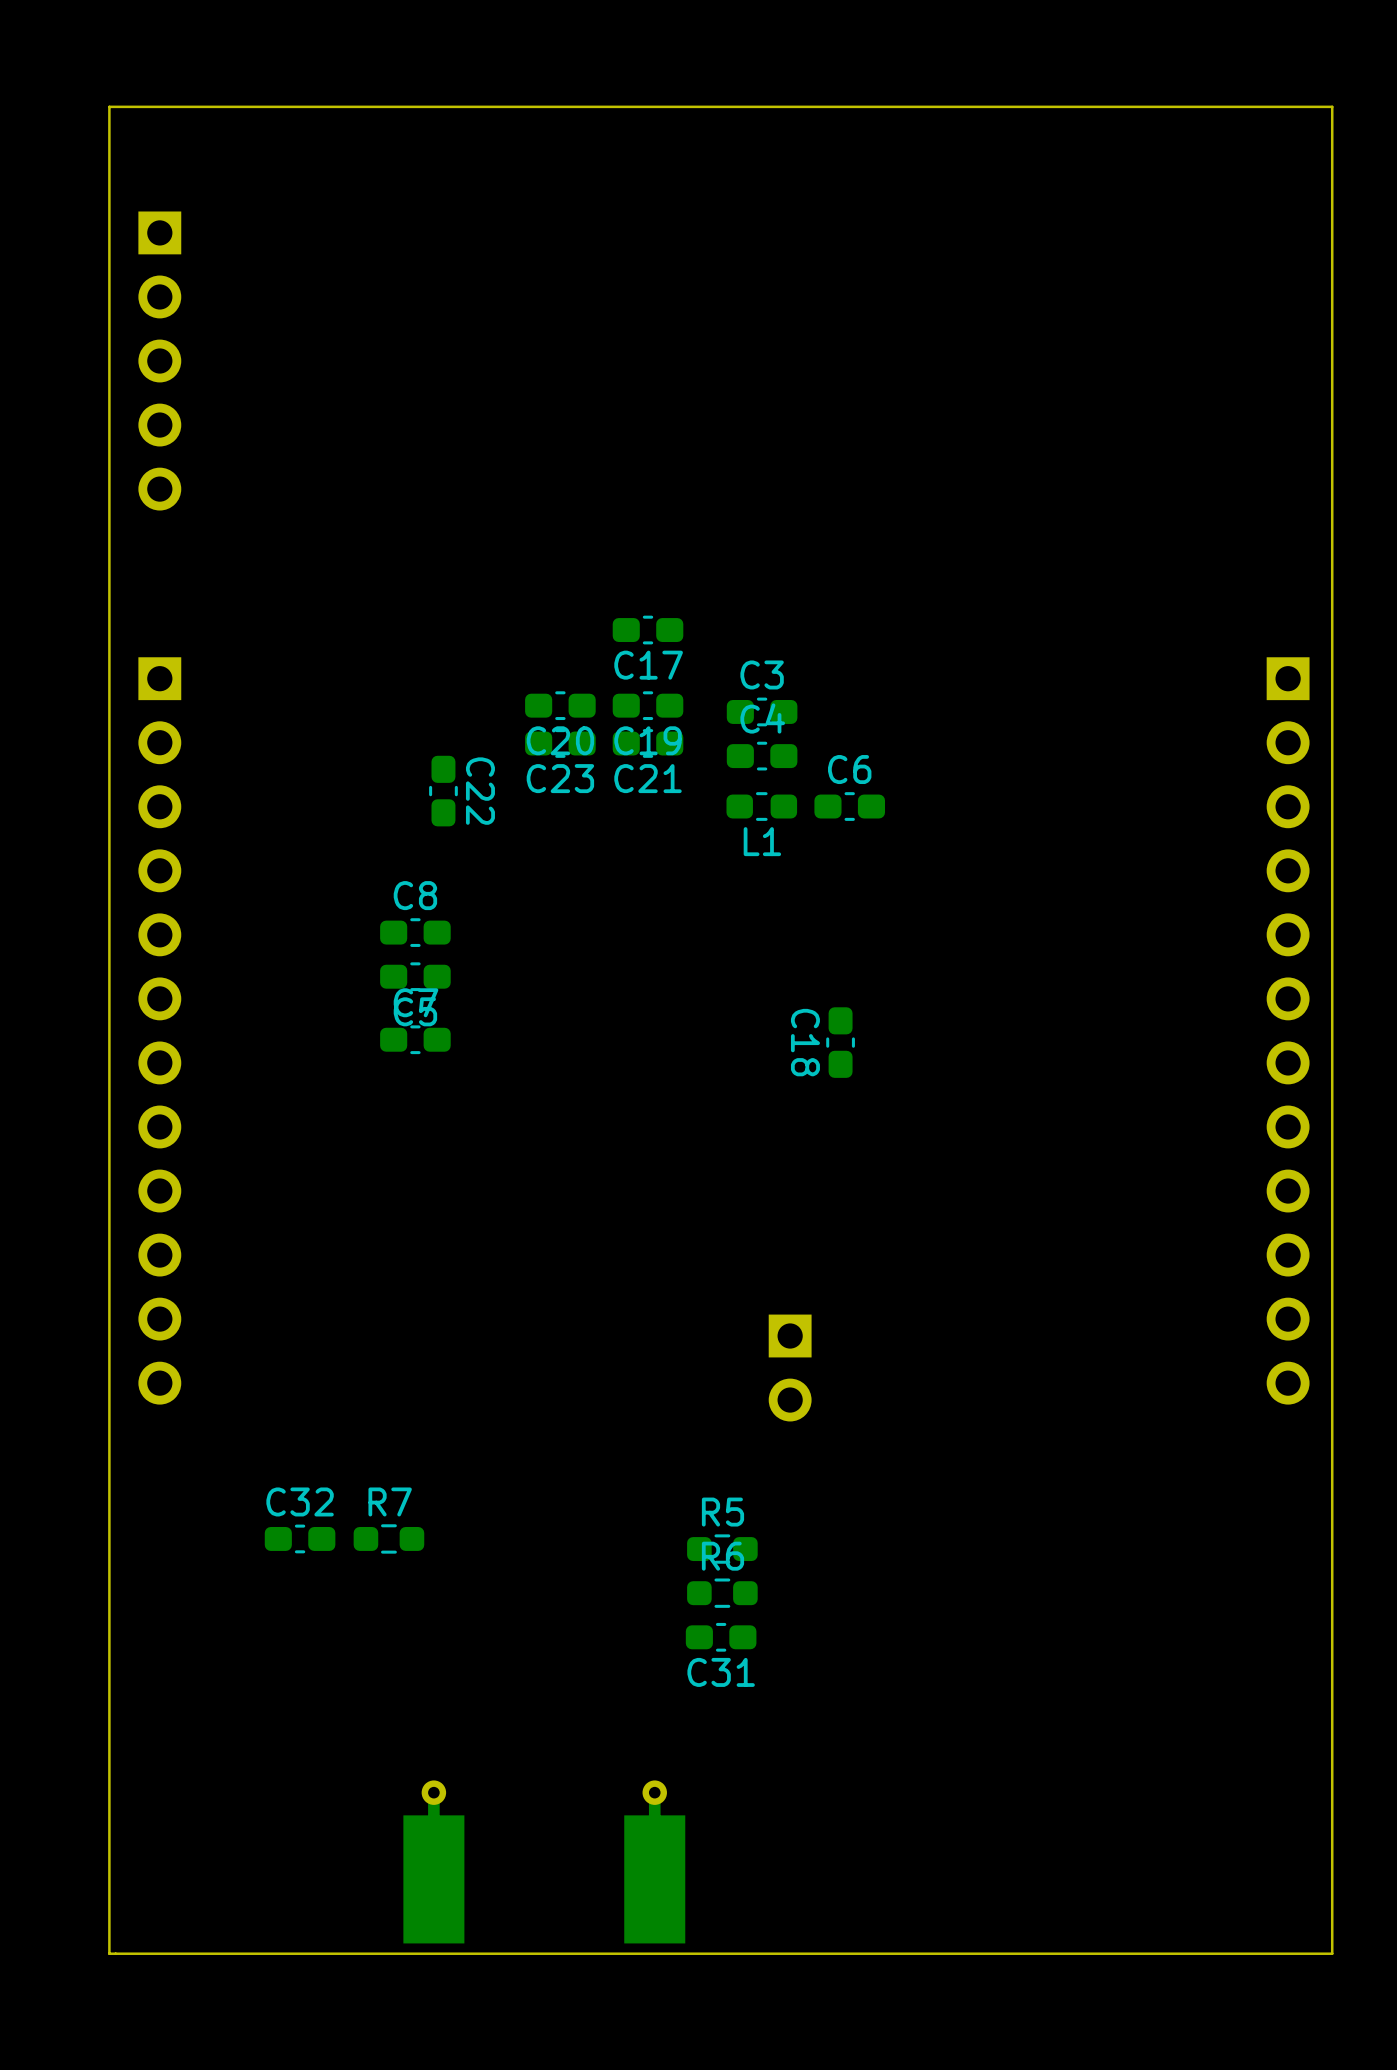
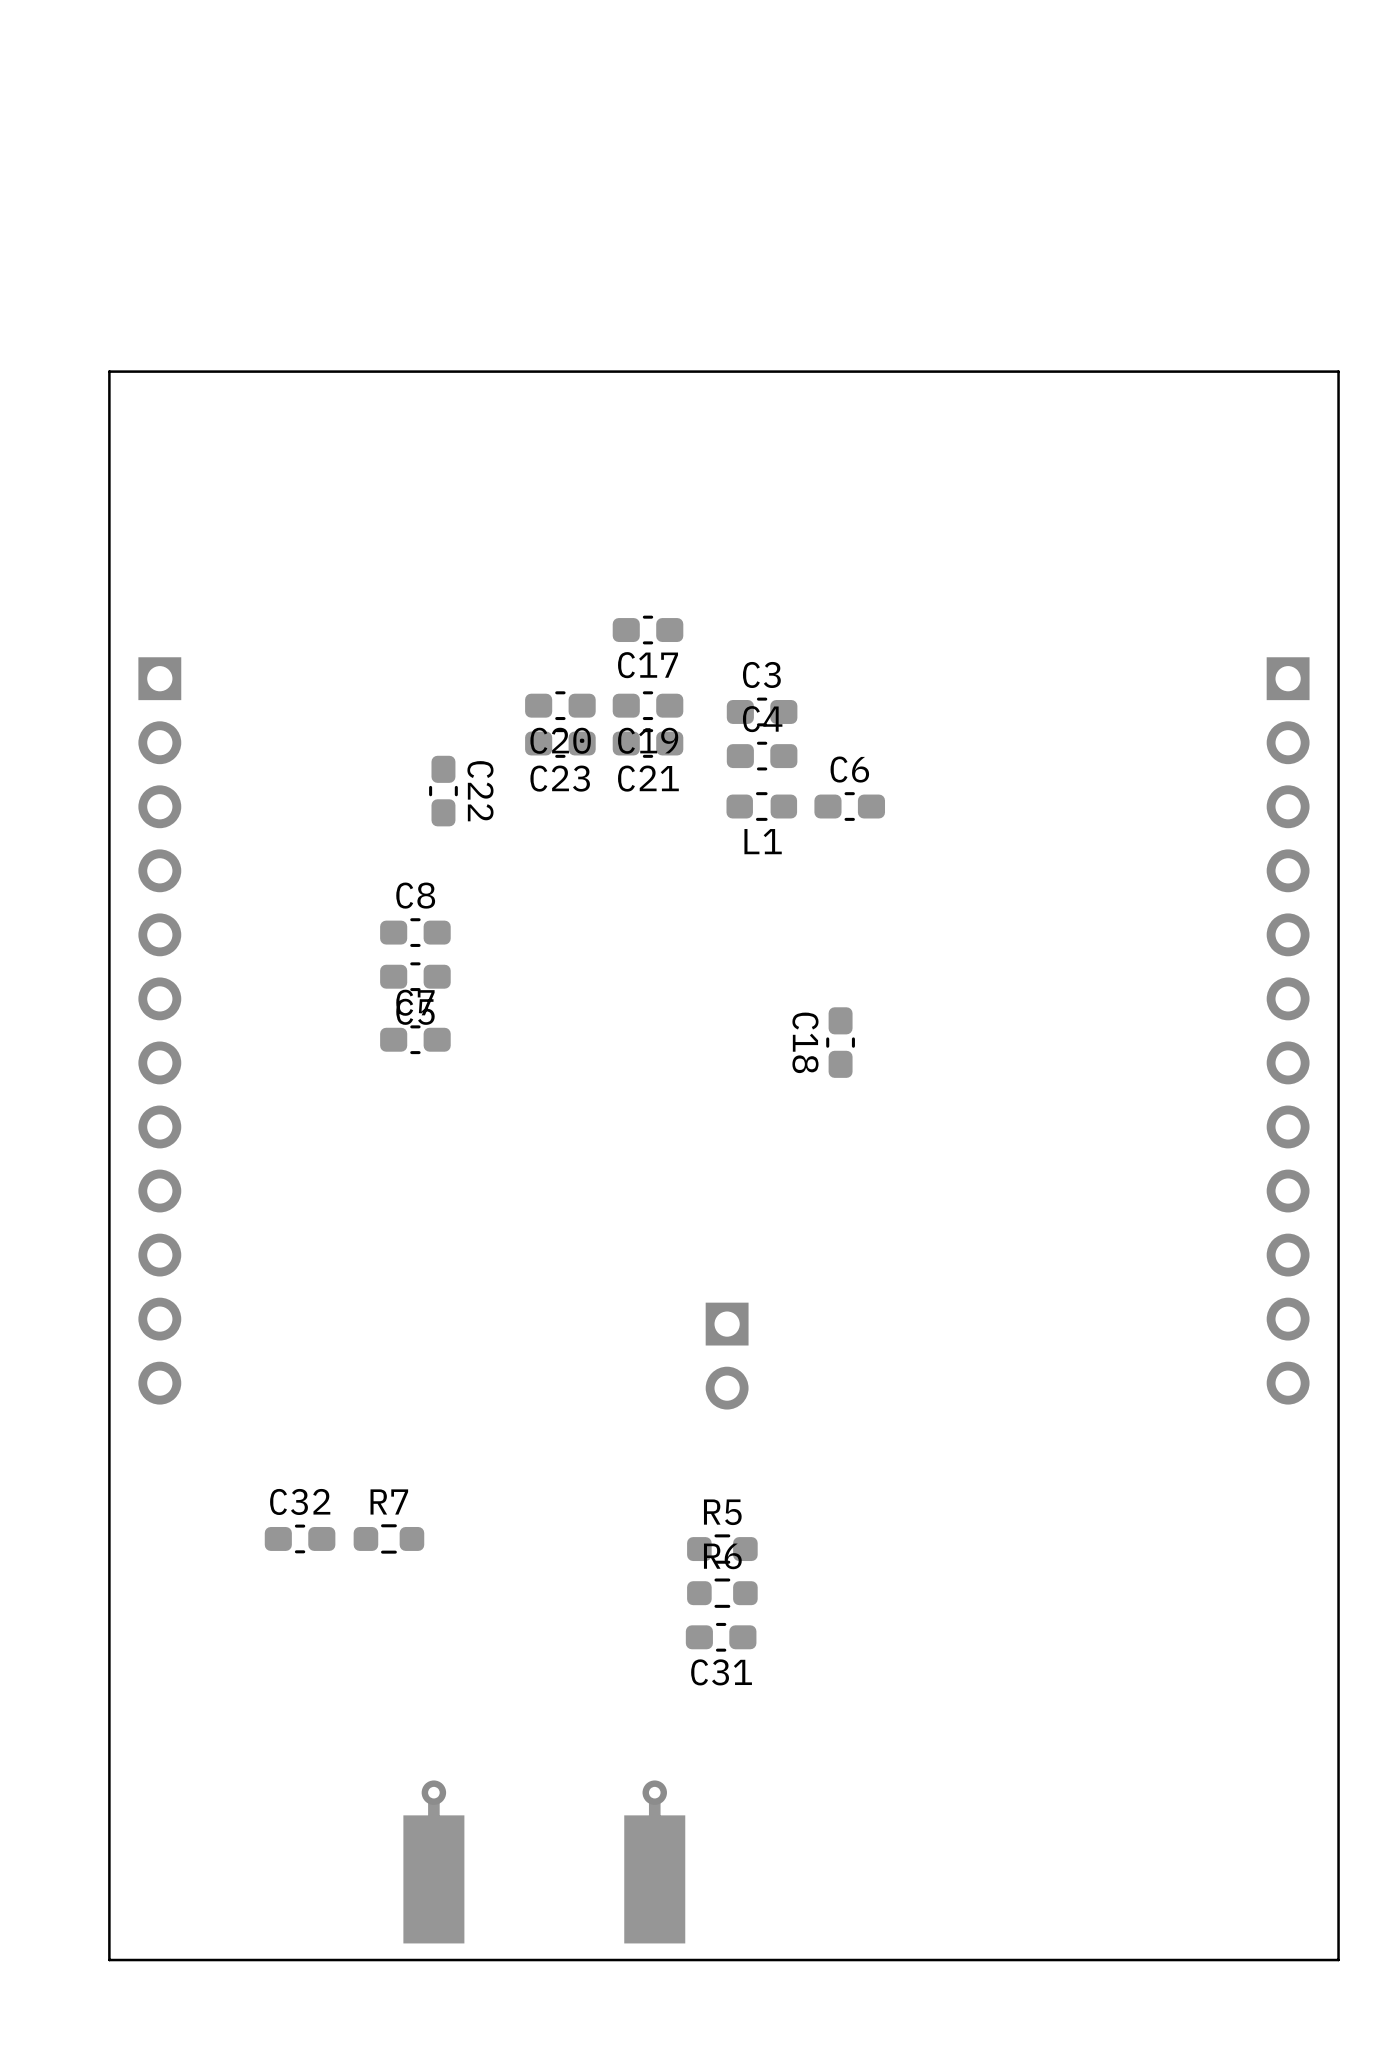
part: (159, 361) -> none
board edge: (109, 371) (109, 106) (1332, 106) (1332, 1953) (109, 1953) -> (109, 371) (1338, 371) (1338, 1960) (109, 1960) (109, 1953)
part position: (790, 1368) -> (727, 1356)

